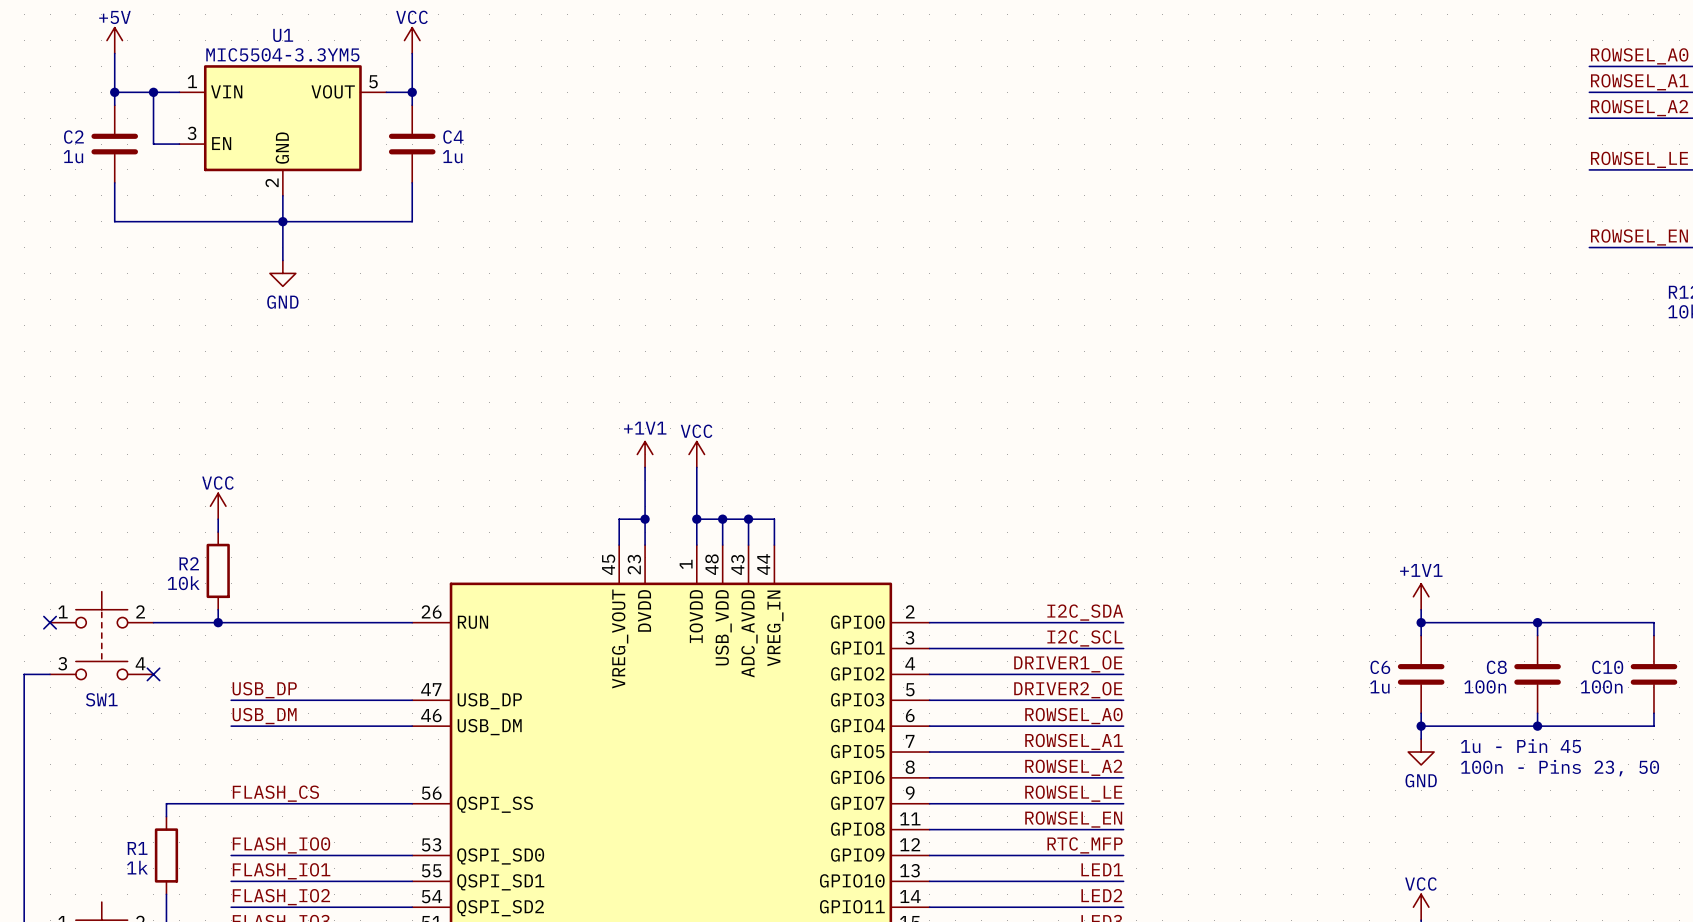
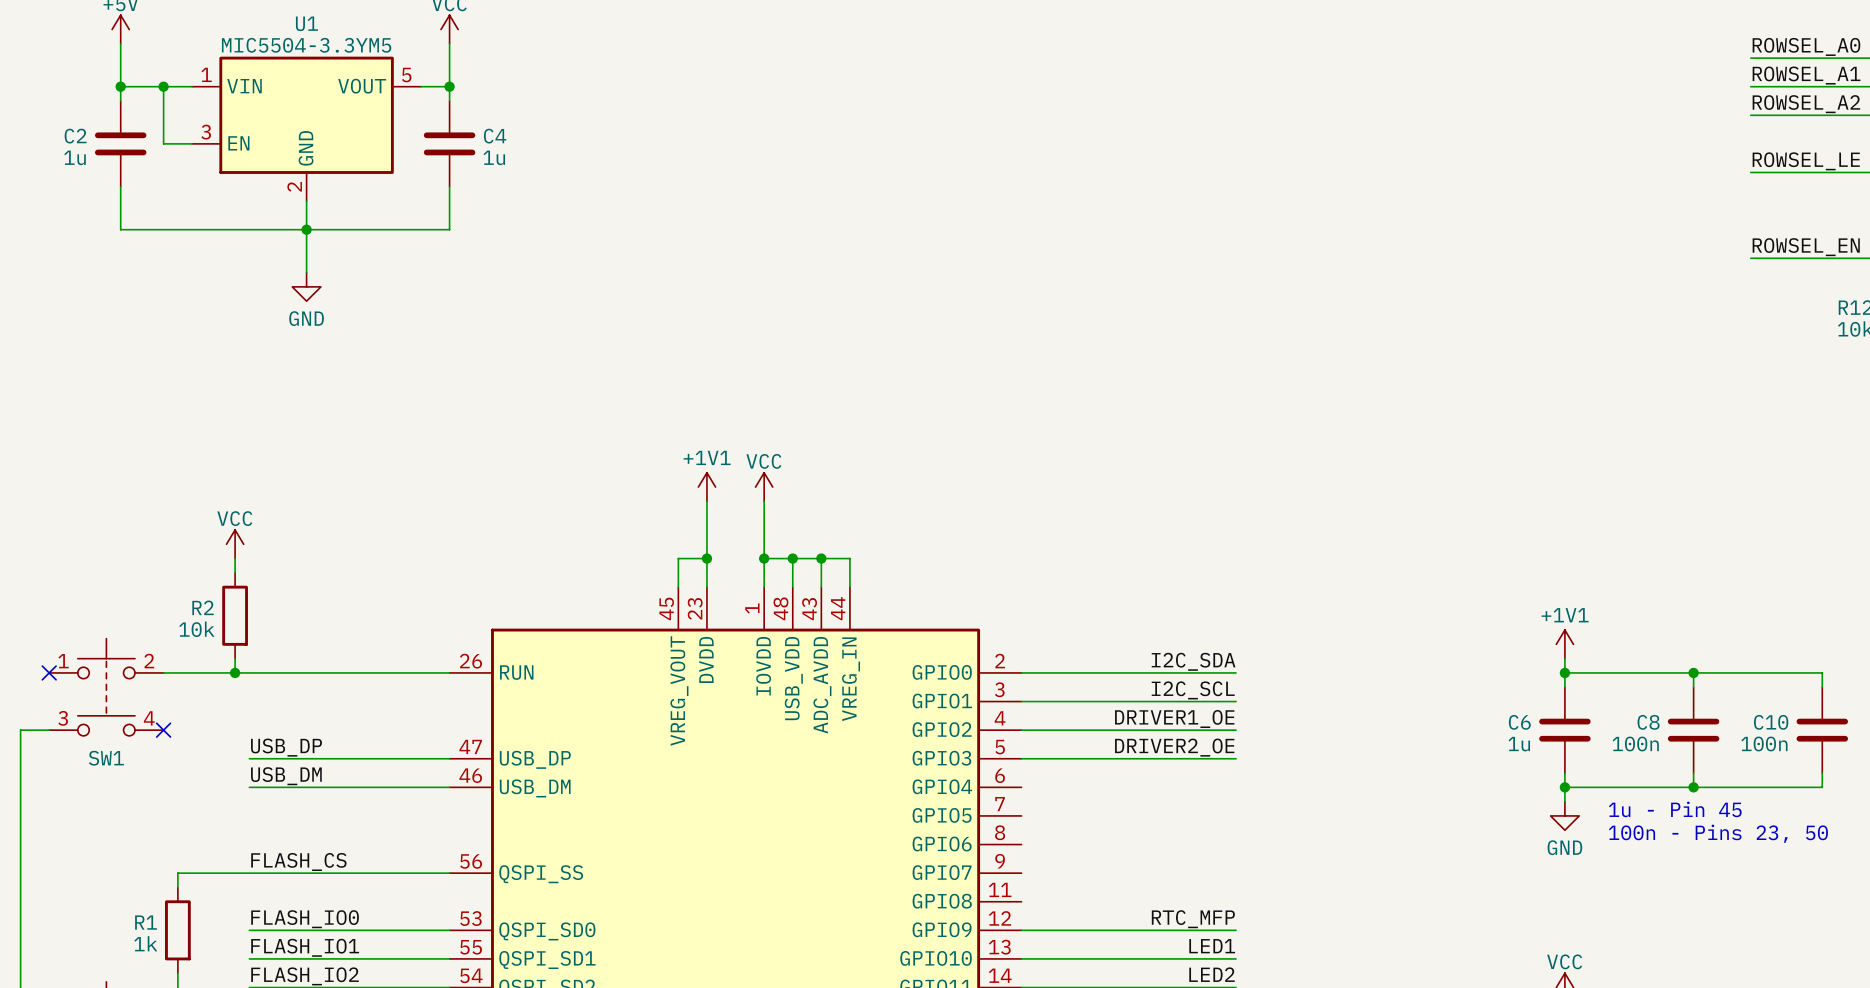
label: ROWSEL_A0 (1073, 716) -> none
wire: (929, 726) (1123, 726) -> none
label: ROWSEL_A1 (1074, 741) -> none
wire: (929, 752) (1123, 752) -> none
label: ROWSEL_A2 (1073, 767) -> none
wire: (929, 777) (1123, 777) -> none
label: ROWSEL_LE (1073, 793) -> none
wire: (929, 803) (1123, 803) -> none
label: ROWSEL_EN (1073, 819) -> none
wire: (929, 829) (1123, 829) -> none

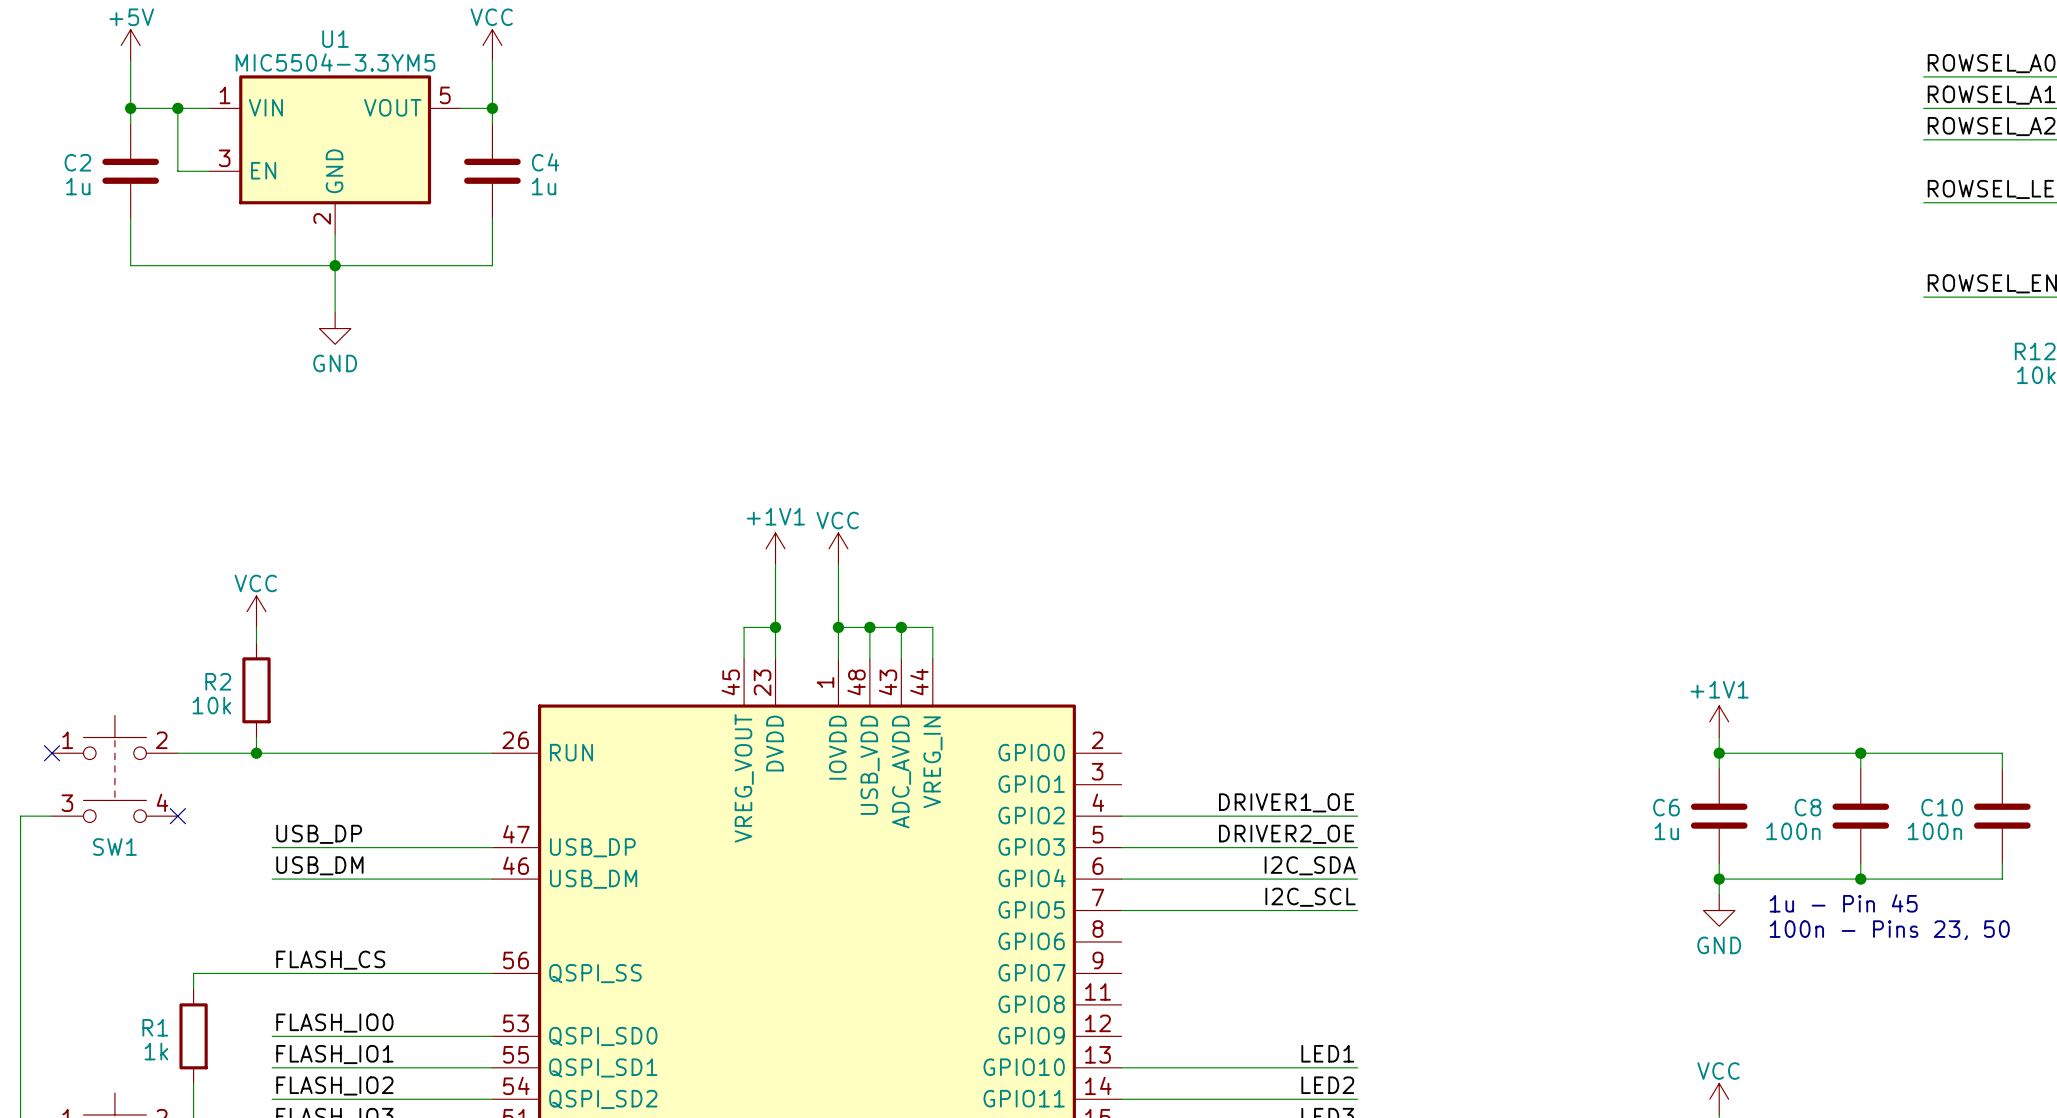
label position: I2C_SDA (1193, 661) -> I2C_SDA (1310, 865)
wire: (1021, 672) (1236, 672) -> none
label position: I2C_SCL (1193, 690) -> I2C_SCL (1310, 897)
wire: (1021, 701) (1236, 701) -> (1121, 879) (1357, 879)
label: RTC_MFP (1193, 919) -> none
wire: (1021, 930) (1236, 930) -> (1121, 910) (1357, 910)

